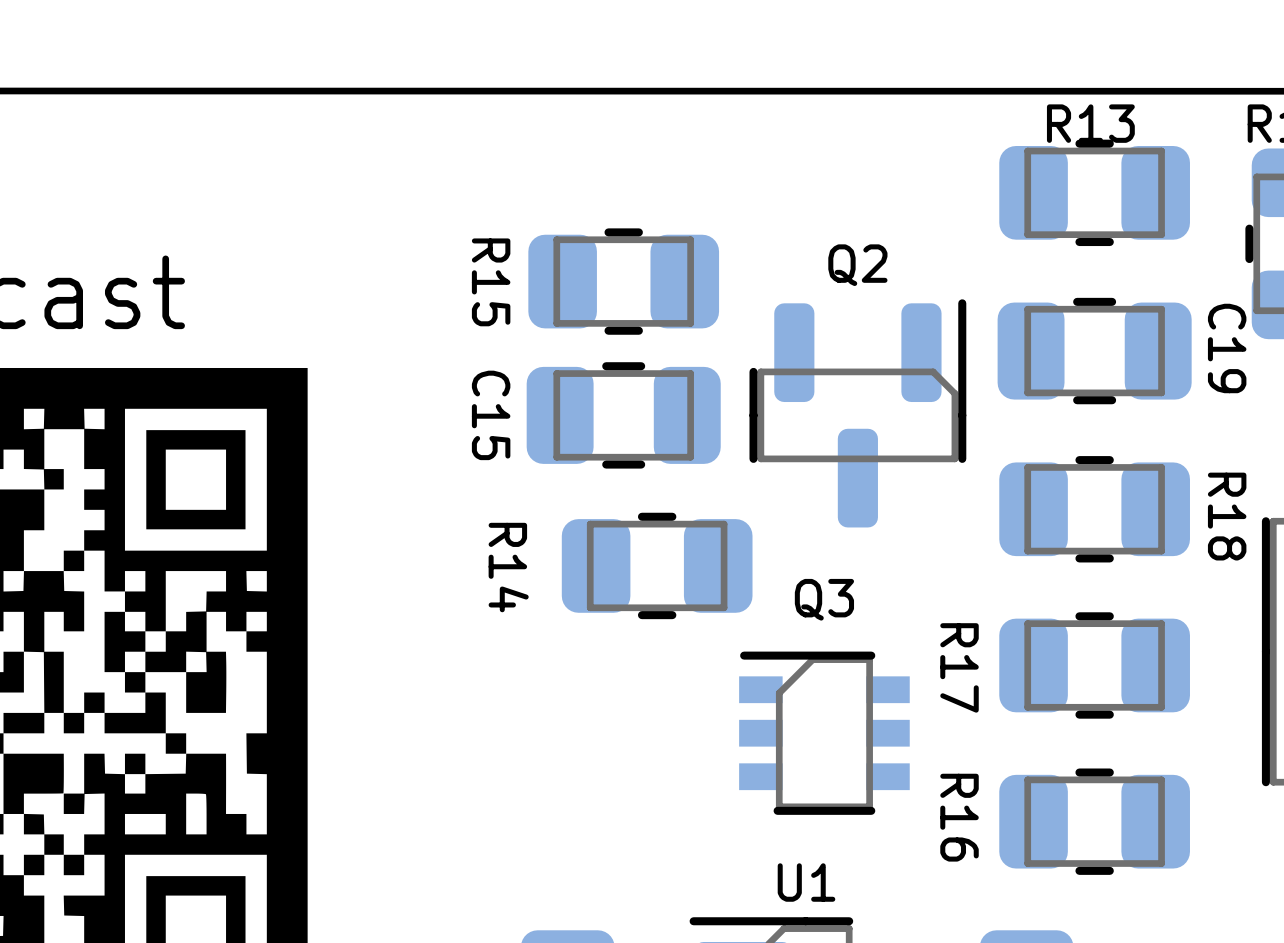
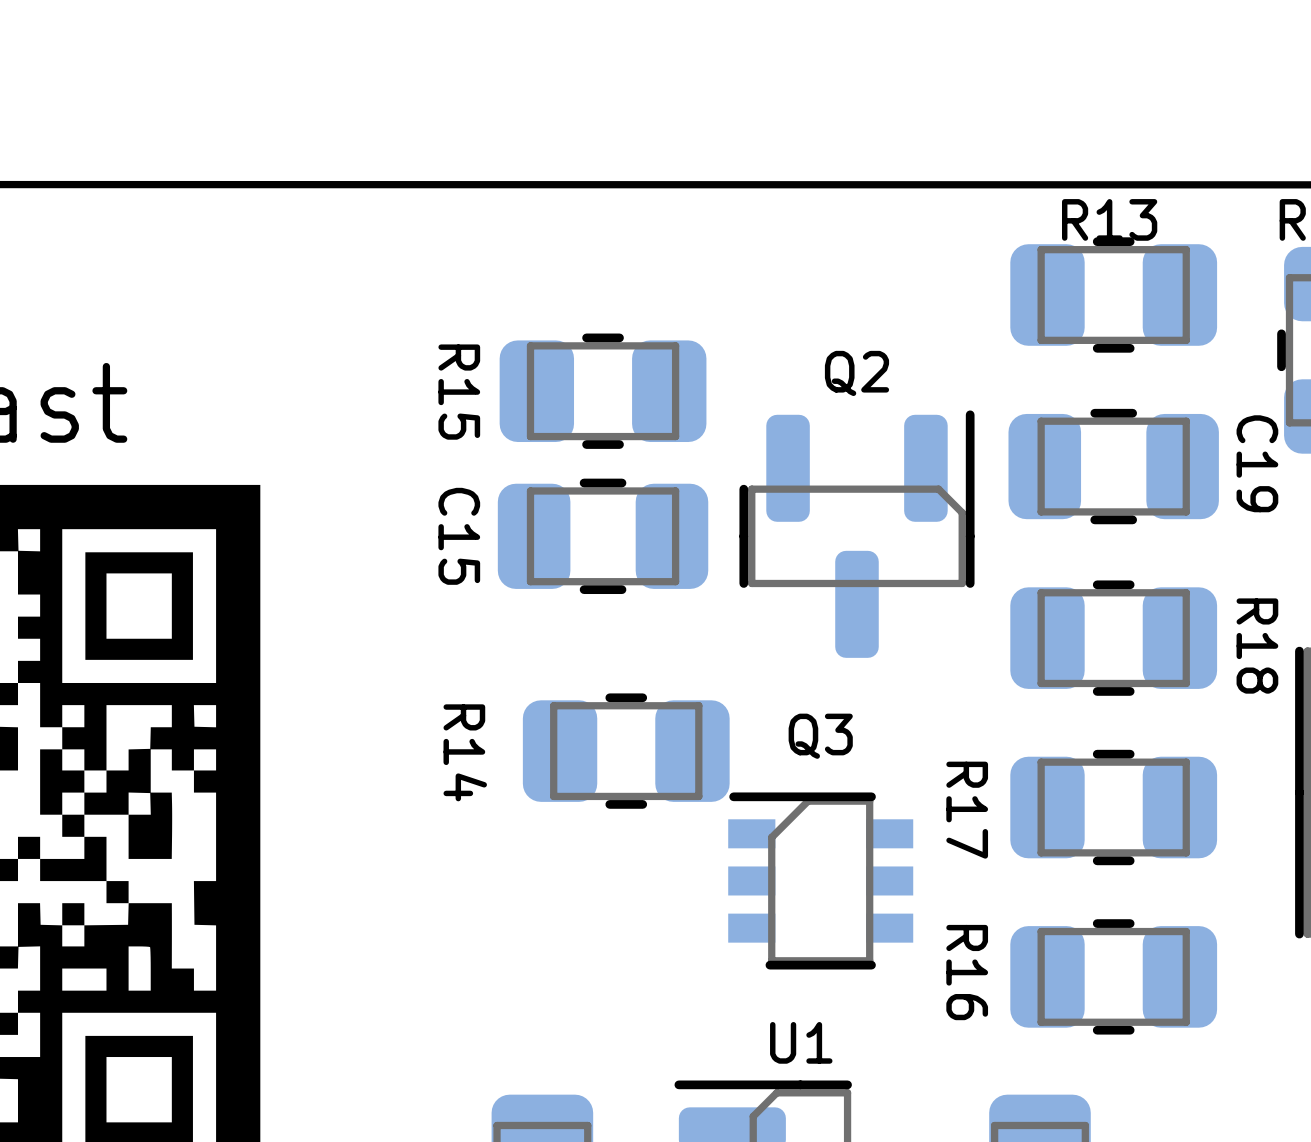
R14 position: (657, 565) -> (626, 751)

